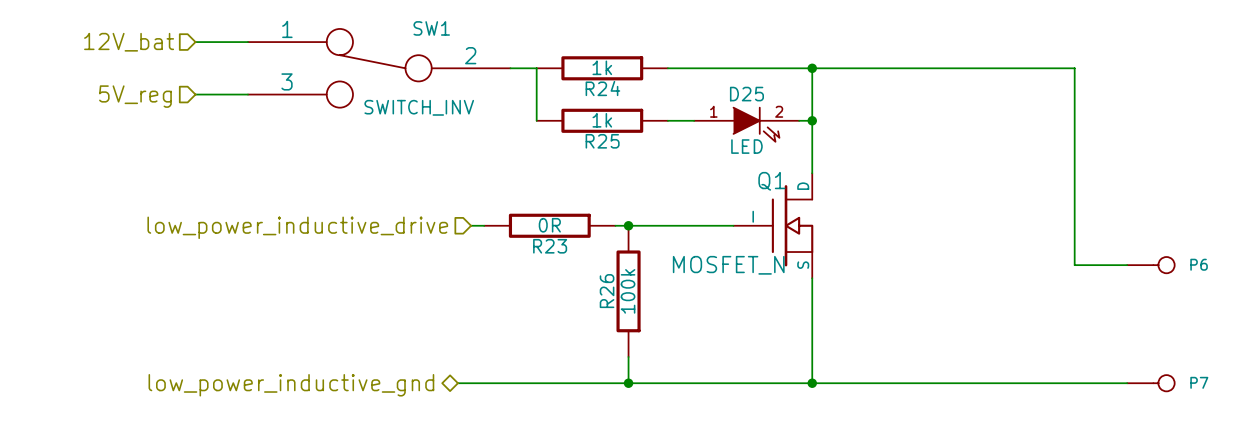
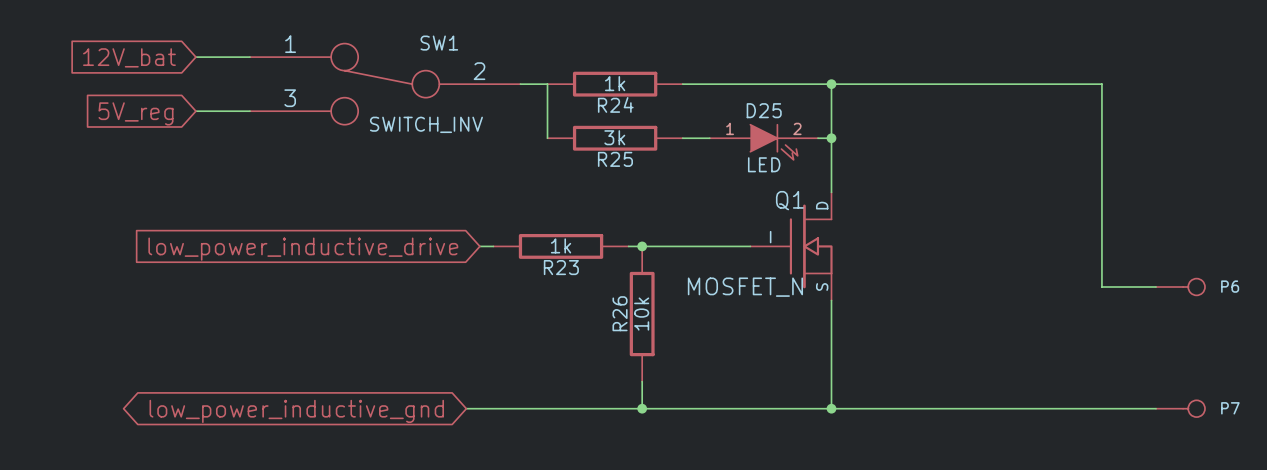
hierarchical label: 12V_bat (129, 42) -> none
global label: none -> 12V_bat (129, 57)
hierarchical label: 5V_reg (135, 96) -> none
global label: none -> 5V_reg (136, 113)
R25 value: 1k (602, 120) -> 3k (614, 137)
R23 value: 0R (549, 225) -> 1k (561, 245)
hierarchical label: low_power_inductive_drive (297, 227) -> none
global label: none -> low_power_inductive_drive (303, 249)
R26 value: 100k (628, 291) -> 10k (641, 314)
hierarchical label: low_power_inductive_gnd (291, 385) -> none
global label: none -> low_power_inductive_gnd (296, 411)

